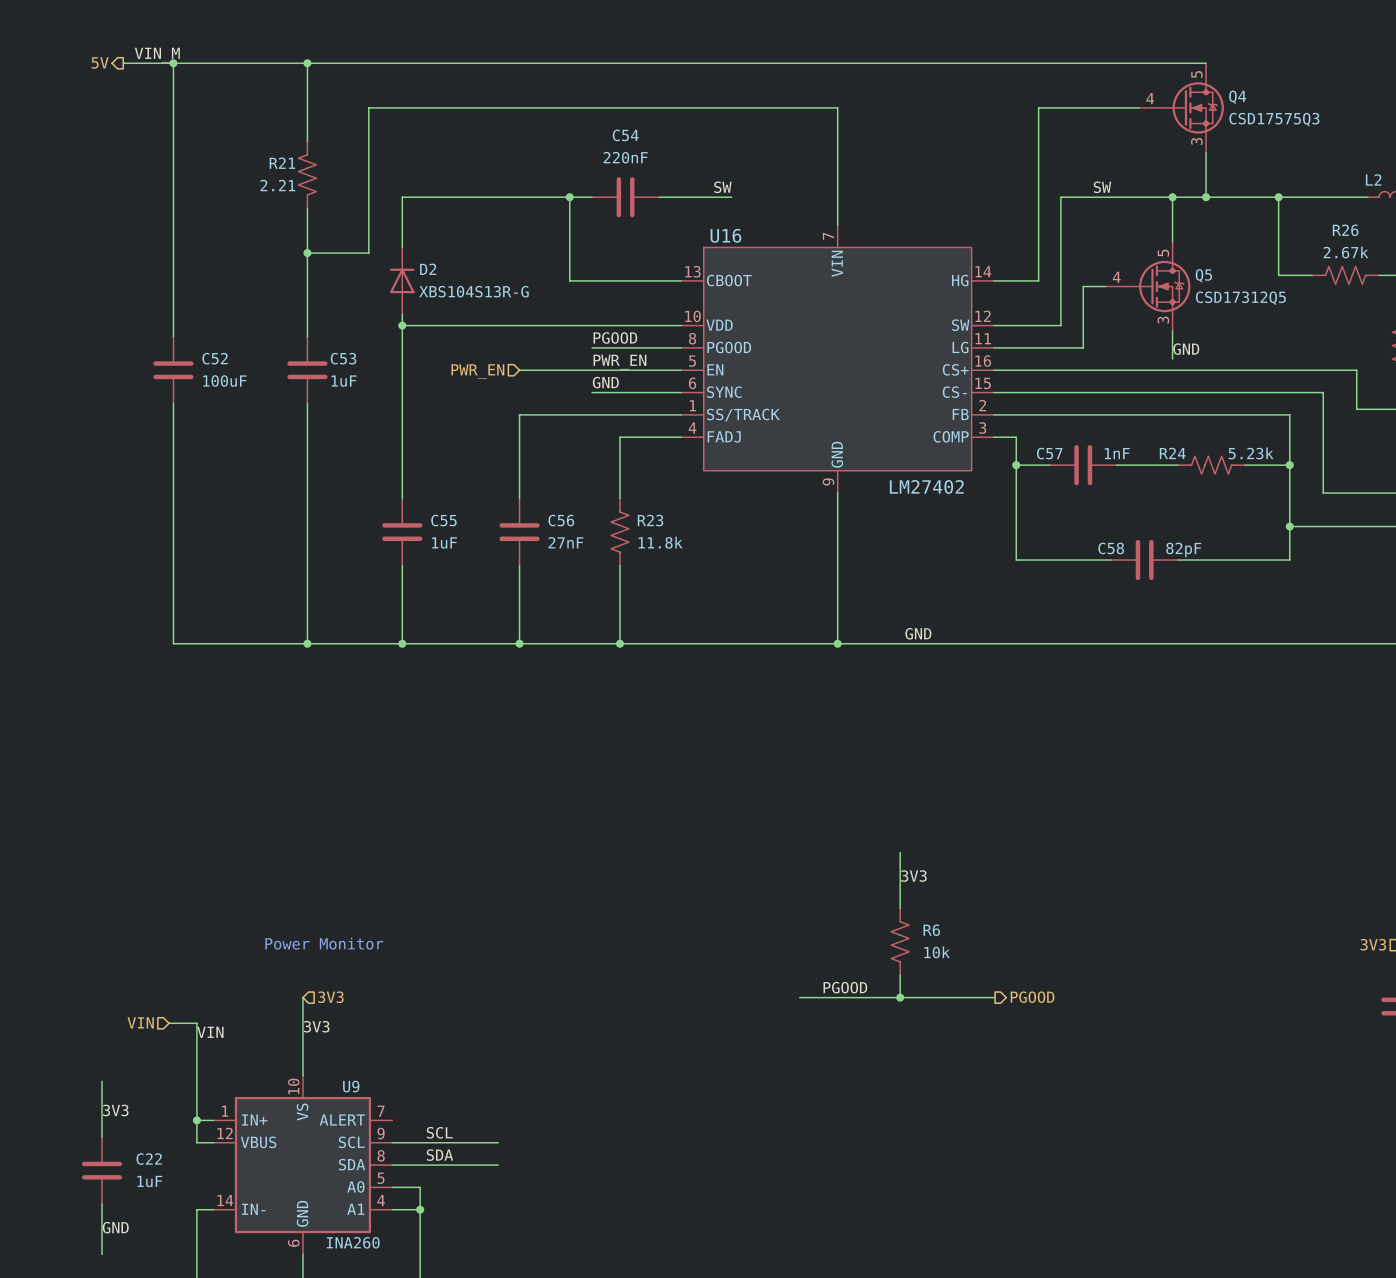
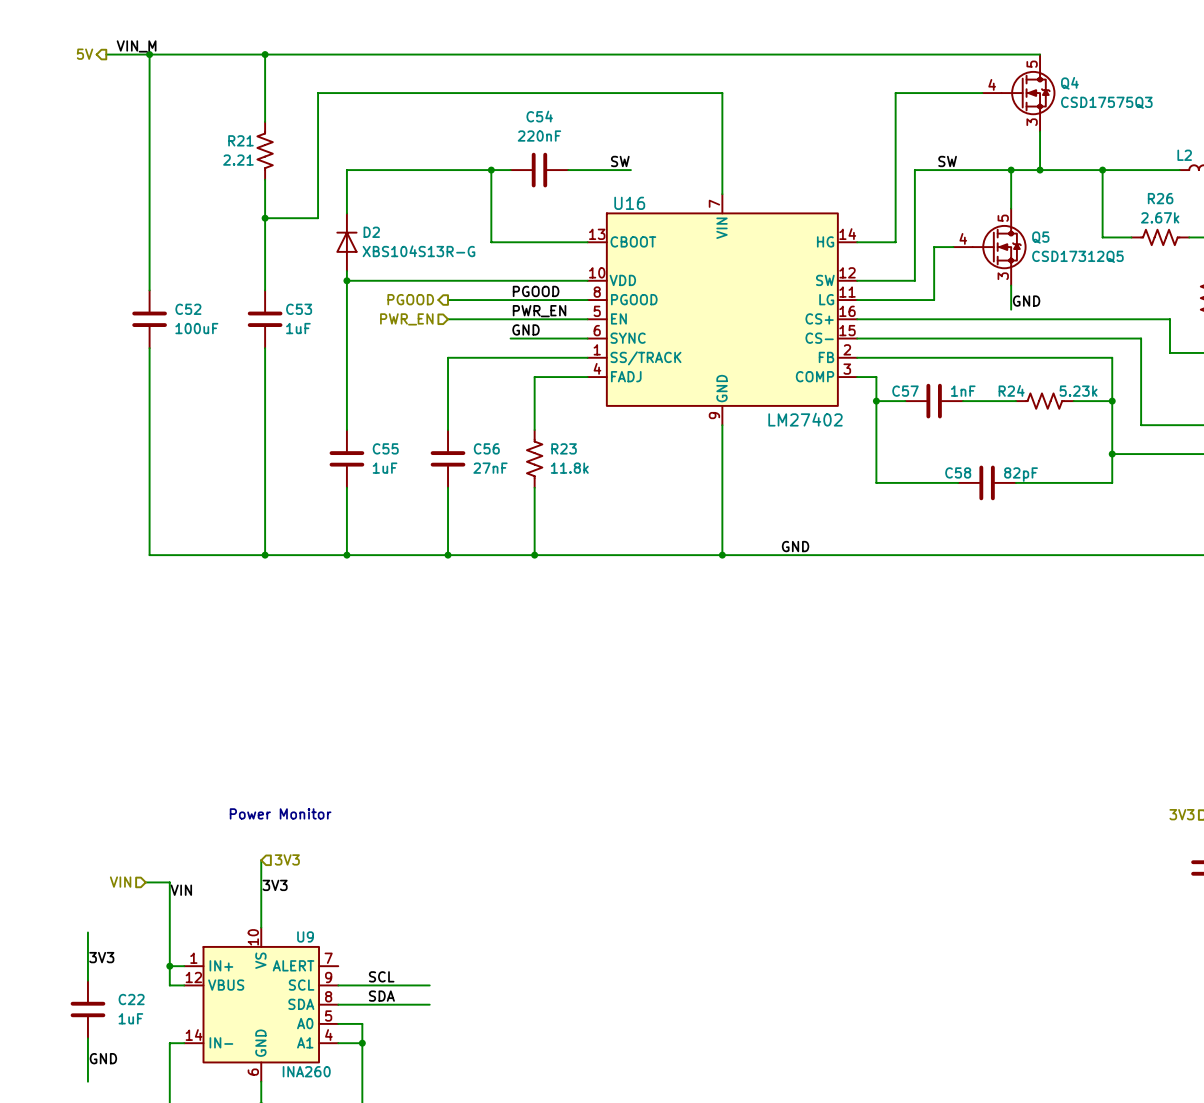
hierarchical label: none -> PGOOD (410, 299)
wire: none -> (448, 300) (510, 300)
wire: (900, 852) (900, 908) -> none
label: 3V3 (913, 876) -> none
R6: 10k (900, 941) -> none
wire: (900, 975) (900, 997) -> none
label: PGOOD (845, 987) -> none
wire: (799, 997) (995, 997) -> none
junction: (900, 997) -> none
hierarchical label: PGOOD (1032, 997) -> none

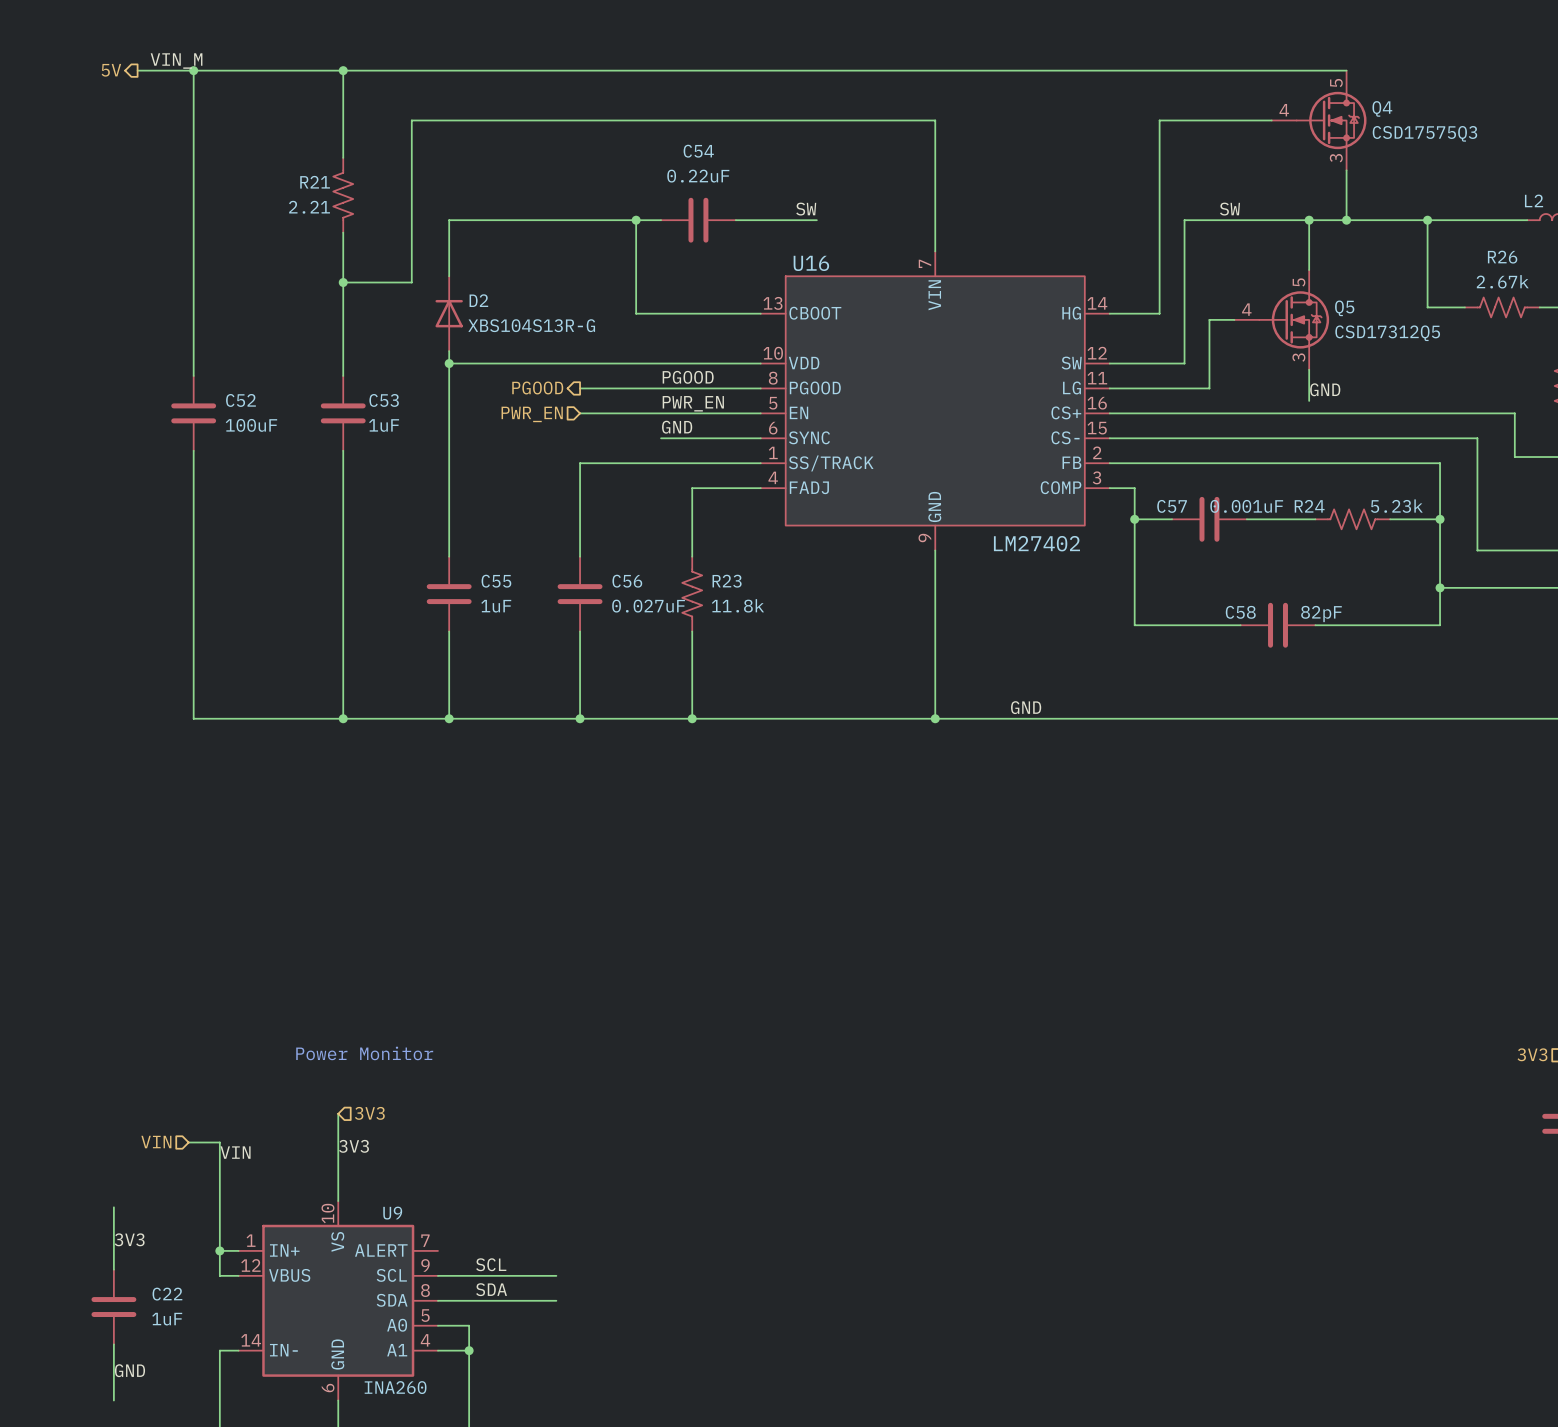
C54 value: 220nF (539, 136) -> 0.22uF (698, 176)
C57 value: 1nF (963, 391) -> 0.001uF (1246, 506)
C56 value: 27nF (490, 468) -> 0.027uF (648, 606)

